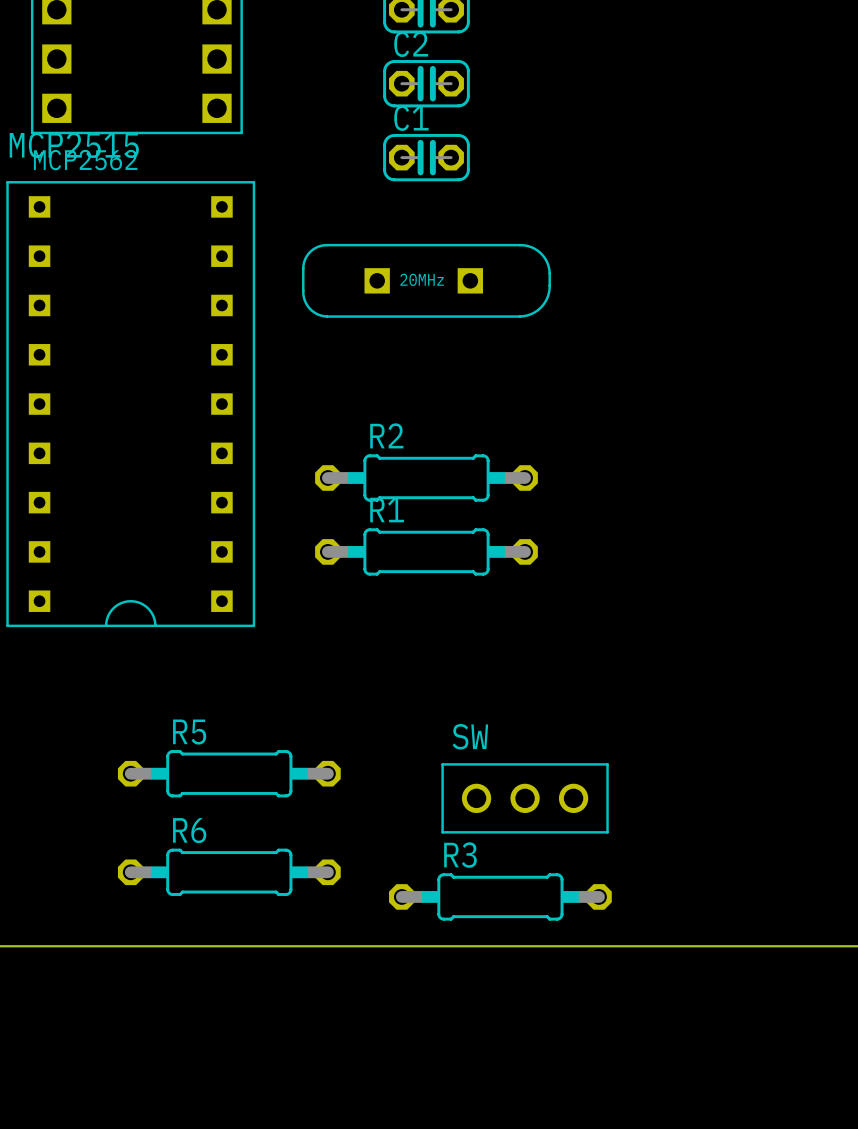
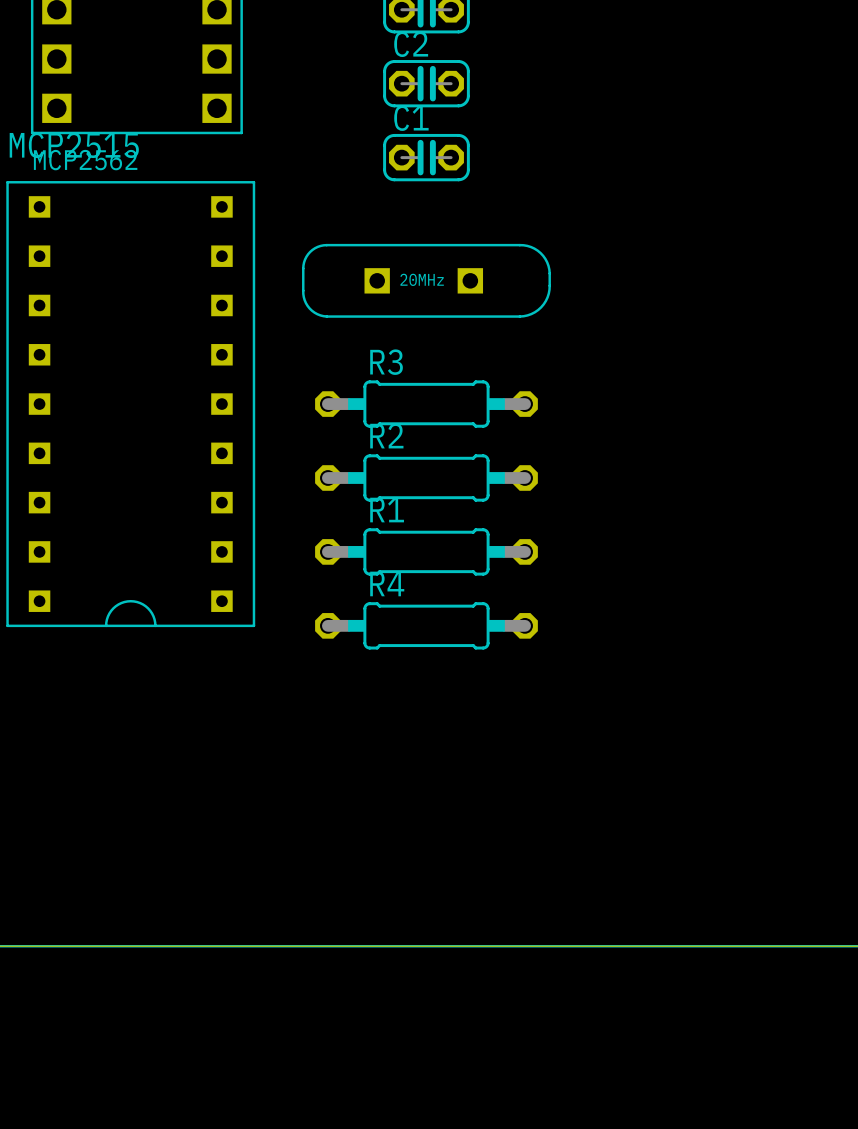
R4: none -> (426, 625)
R5: (229, 773) -> none
SW: (525, 798) -> none
R6: (229, 872) -> none
R3 position: (500, 896) -> (426, 404)

